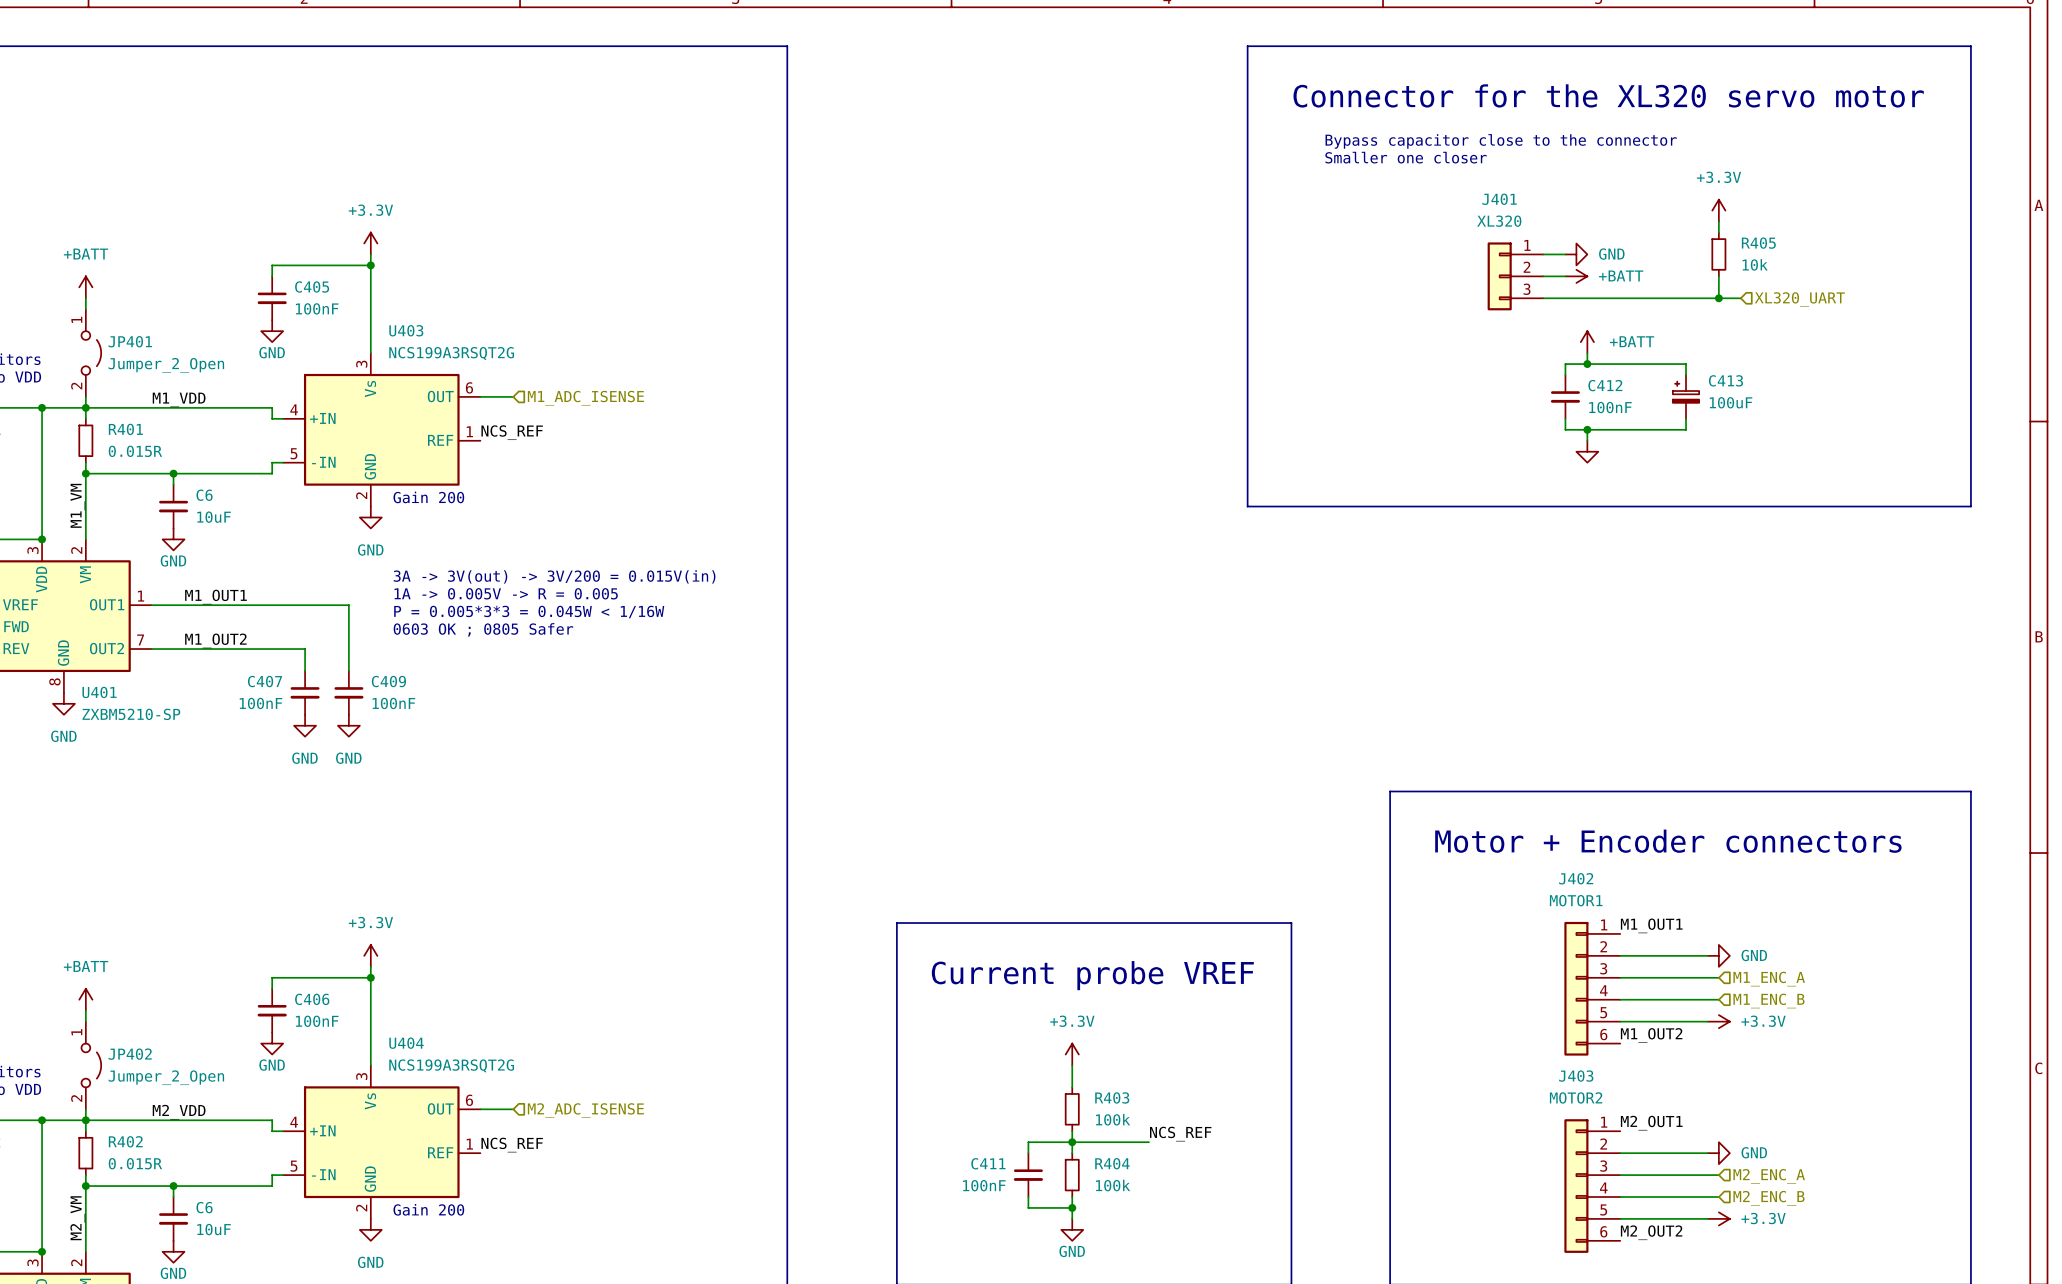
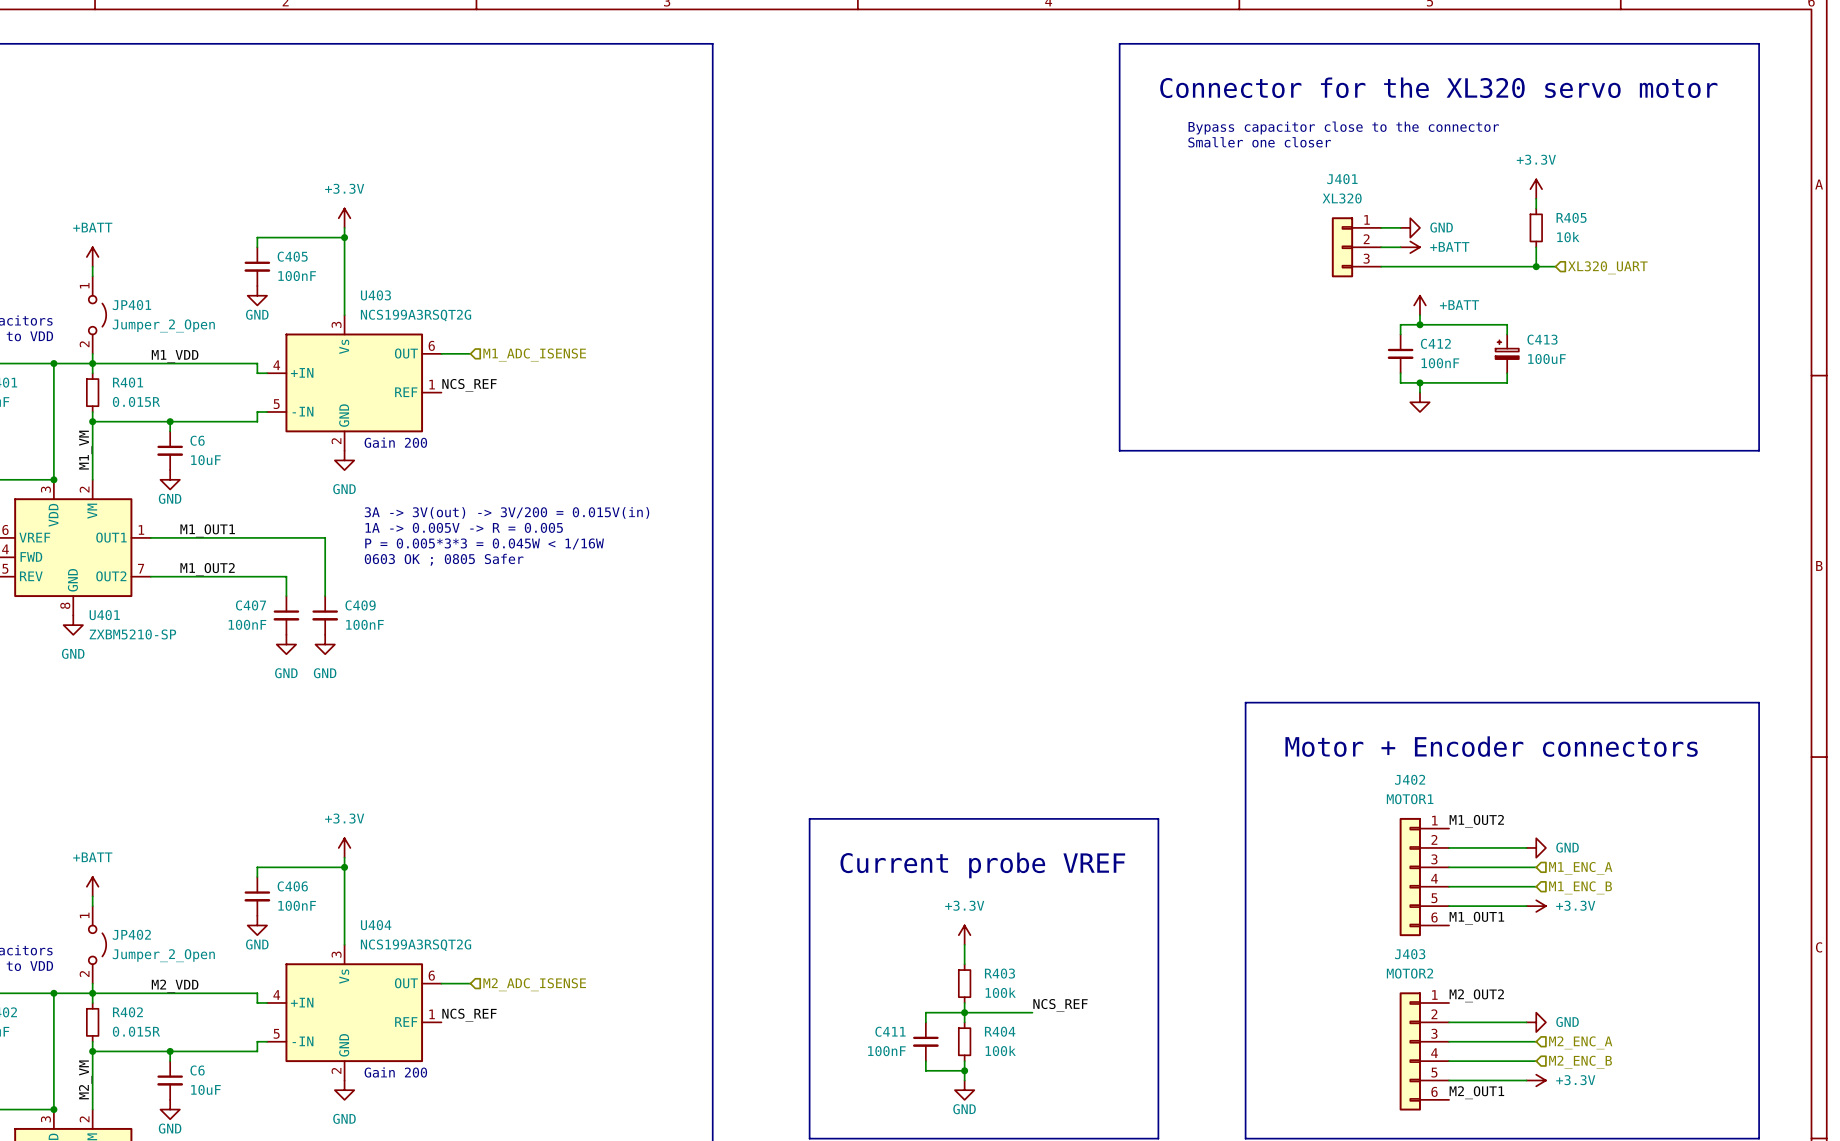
label: M1_OUT1 (1651, 925) -> M1_OUT2 (1476, 821)
label: M1_OUT2 (1651, 1035) -> M1_OUT1 (1476, 918)
label: M2_OUT1 (1651, 1123) -> M2_OUT2 (1476, 995)
label: M2_OUT2 (1651, 1232) -> M2_OUT1 (1476, 1092)

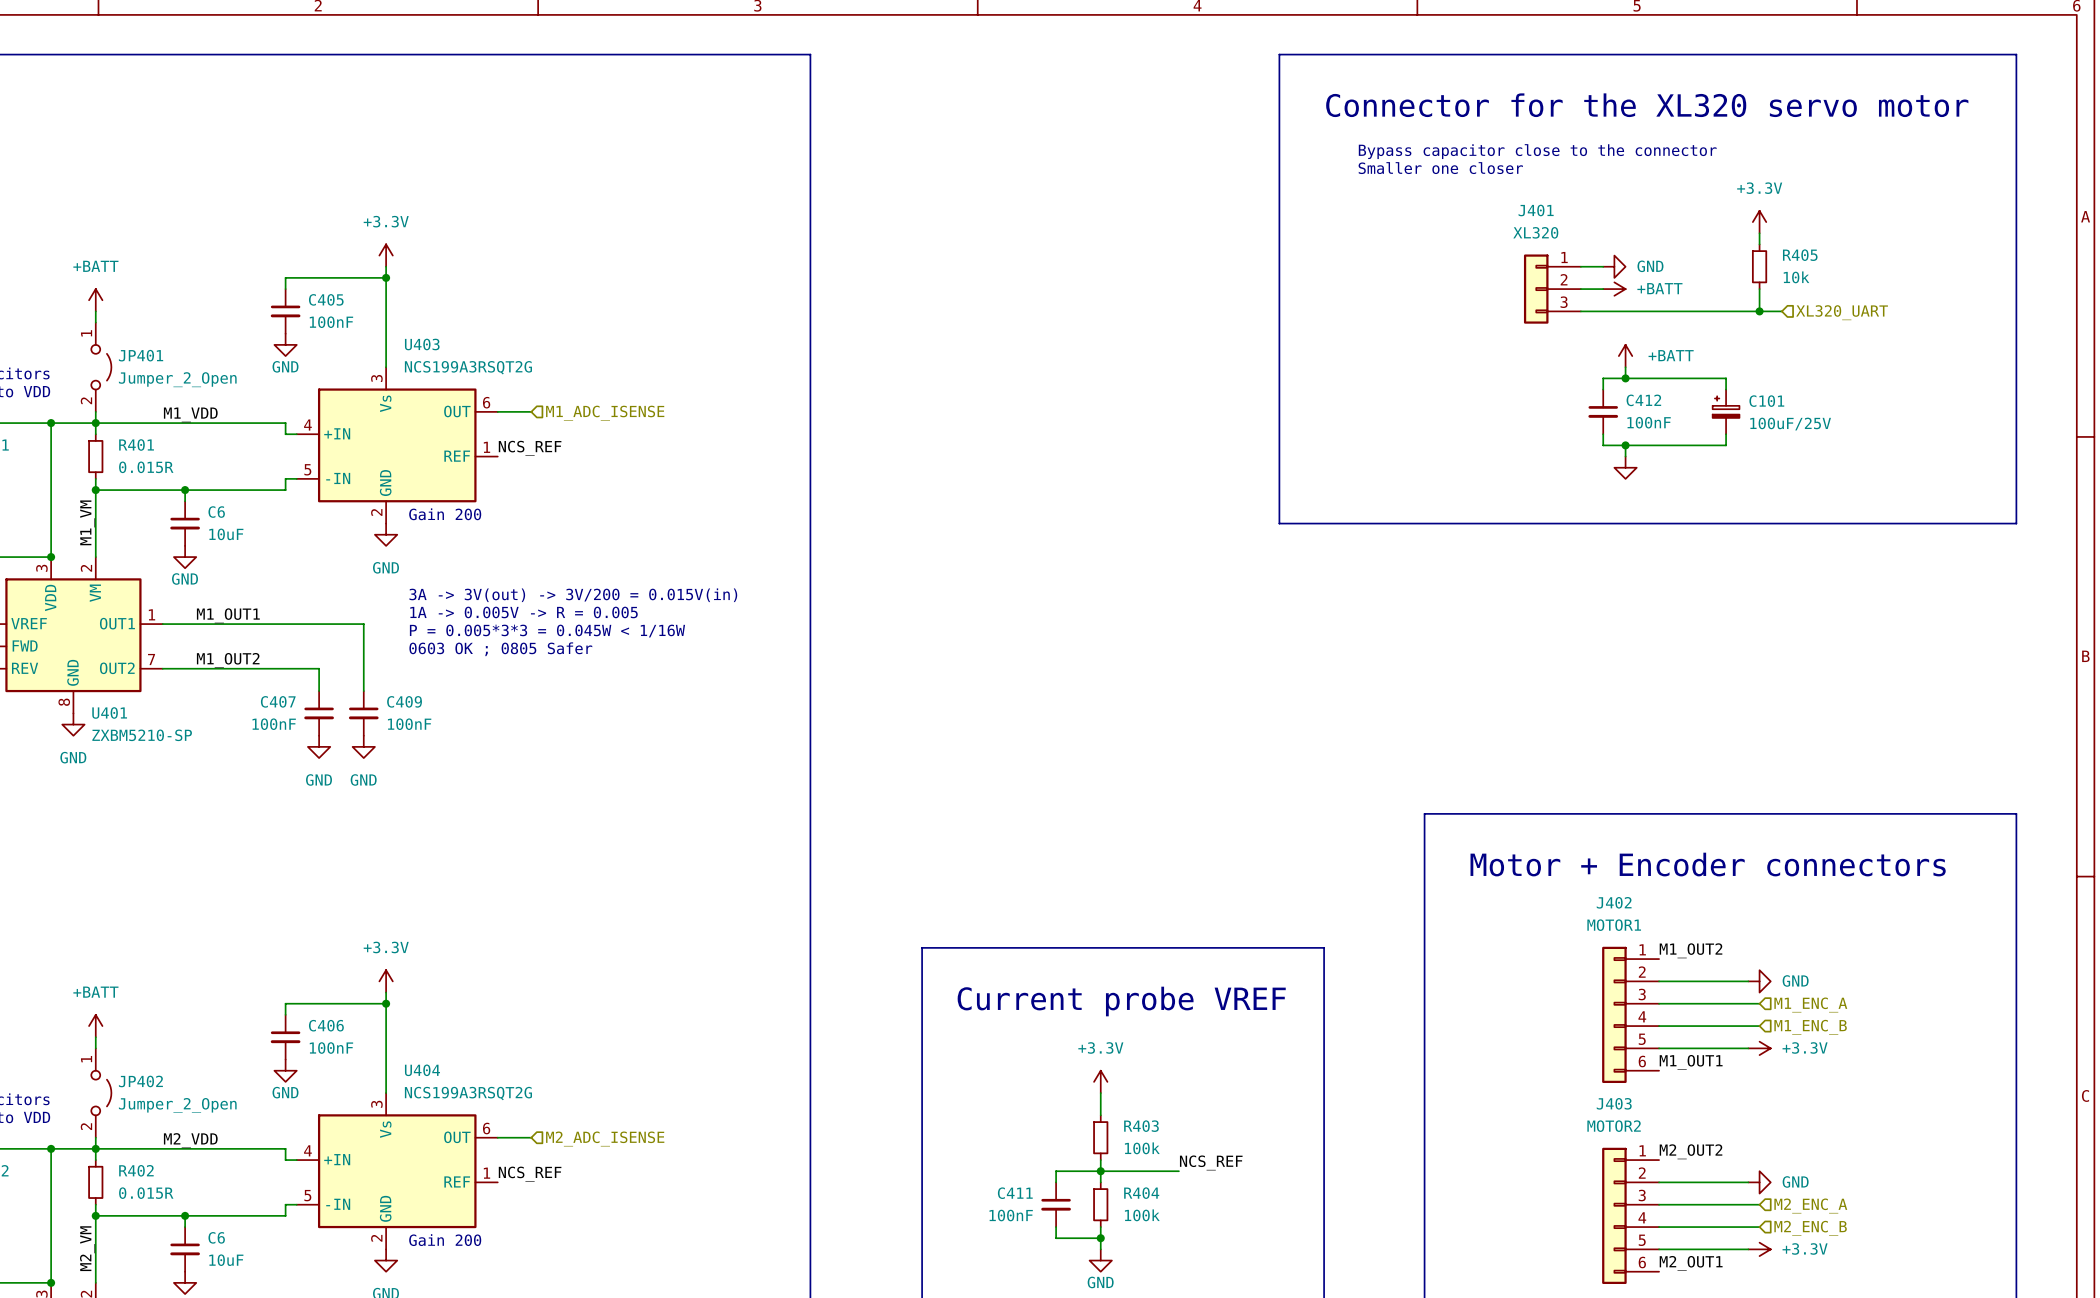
C413 name: C413 (1542, 339) -> C101 (1766, 401)
C413 value: 100uF (1546, 359) -> 100uF/25V (1790, 424)

